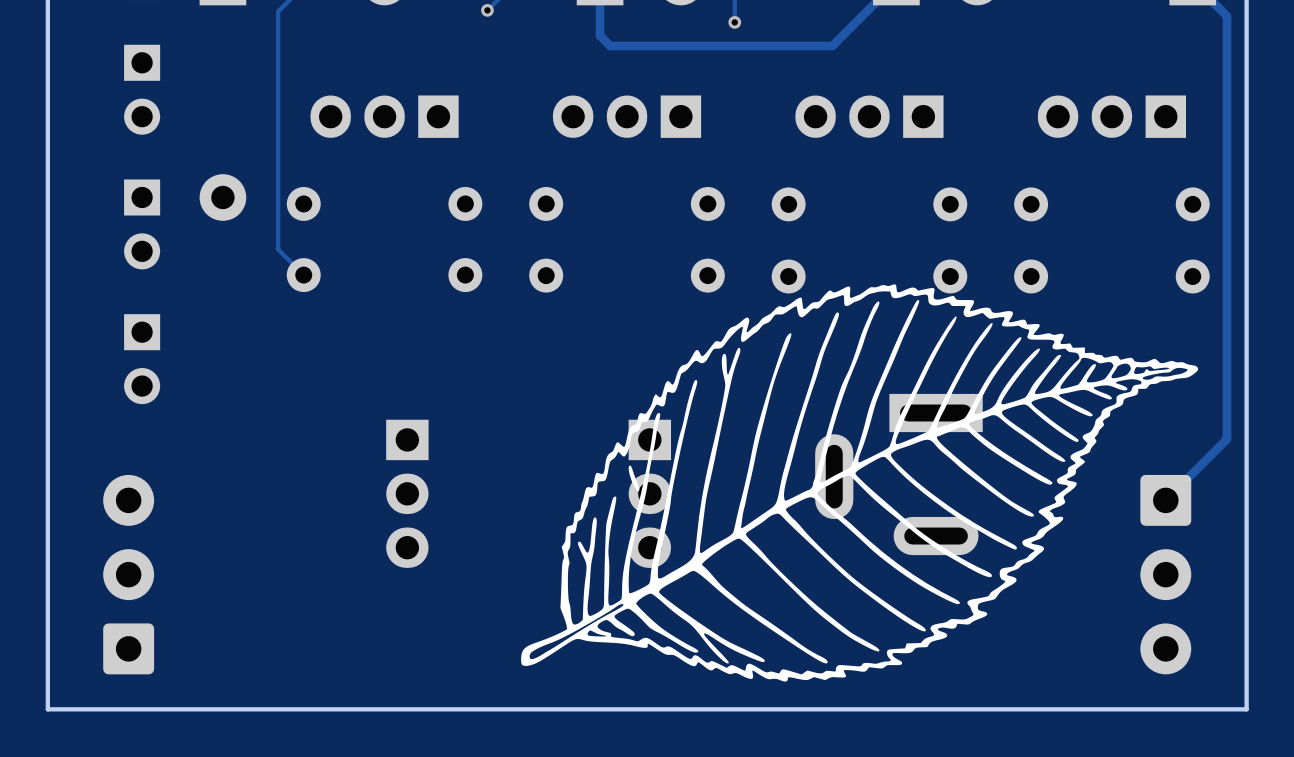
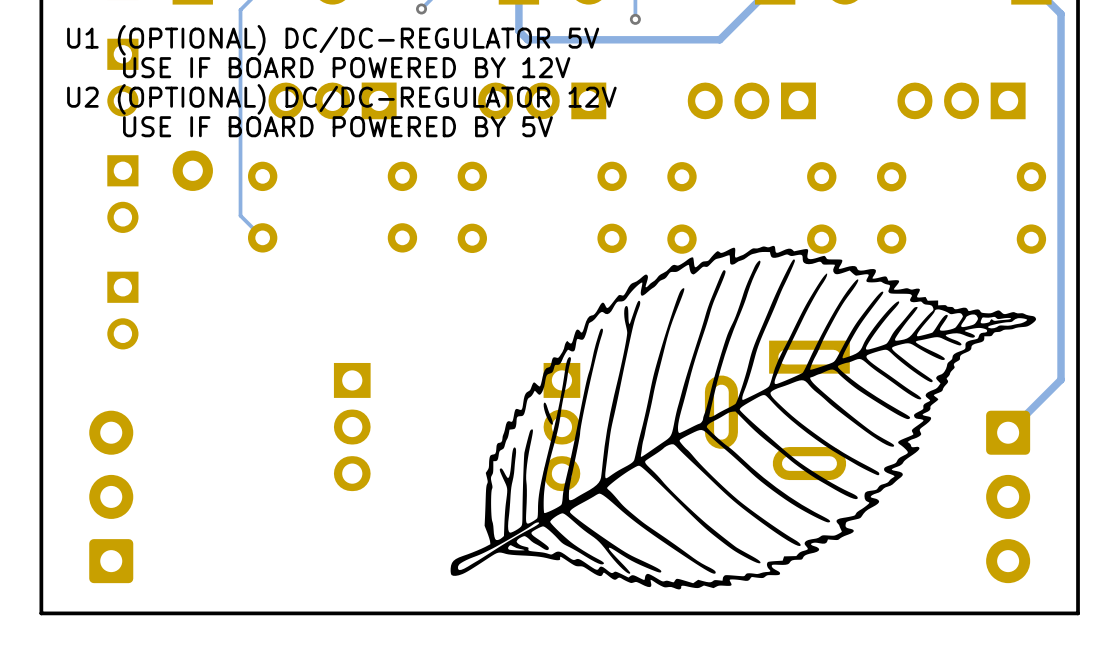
text: none -> U1 (OPTIONAL) DC/DC-REGULATOR 5V (333, 40)
text: none -> USE IF BOARD POWERED BY 12V (346, 67)
text: none -> U2 (OPTIONAL) DC/DC-REGULATOR 12V (341, 99)
text: none -> USE IF BOARD POWERED BY 5V (337, 126)

